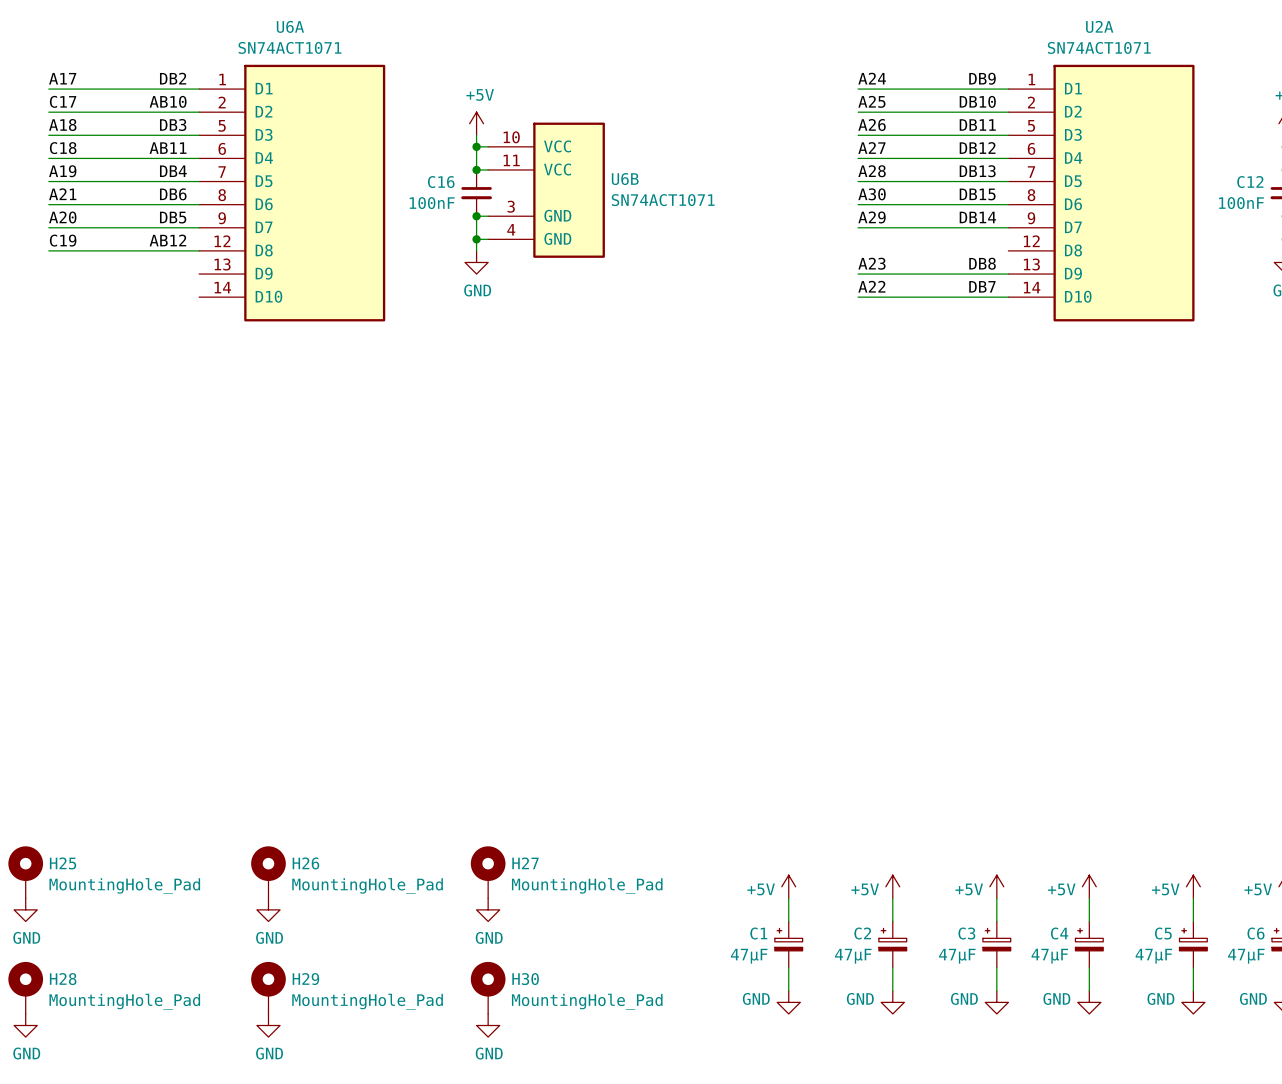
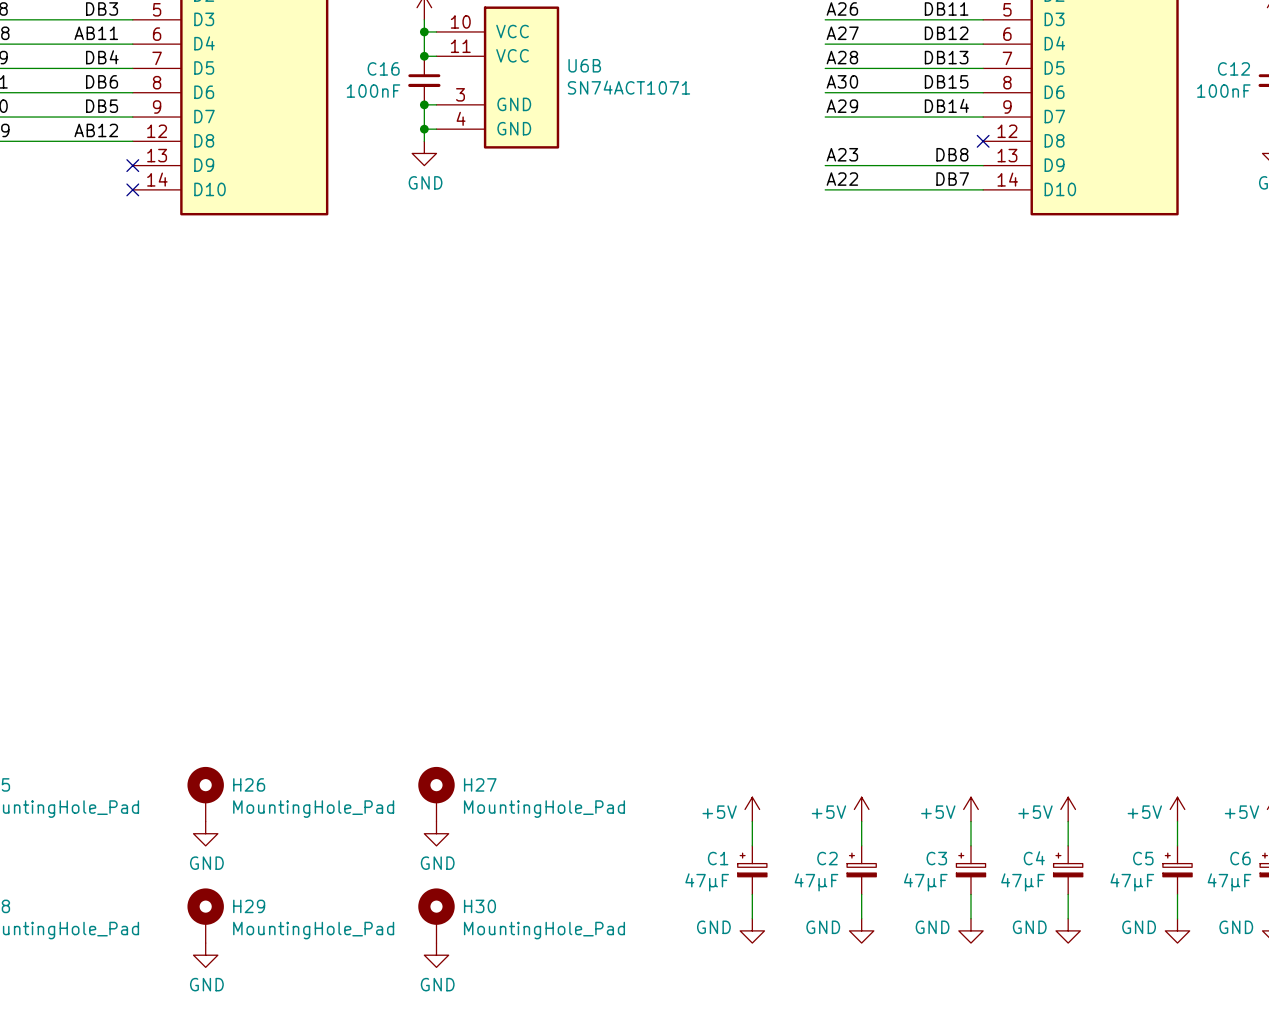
no-connect mark: none -> (983, 141)
no-connect mark: none -> (132, 165)
no-connect mark: none -> (132, 189)

